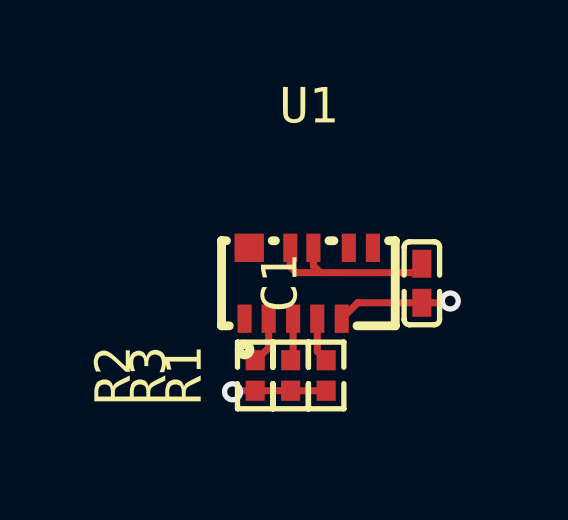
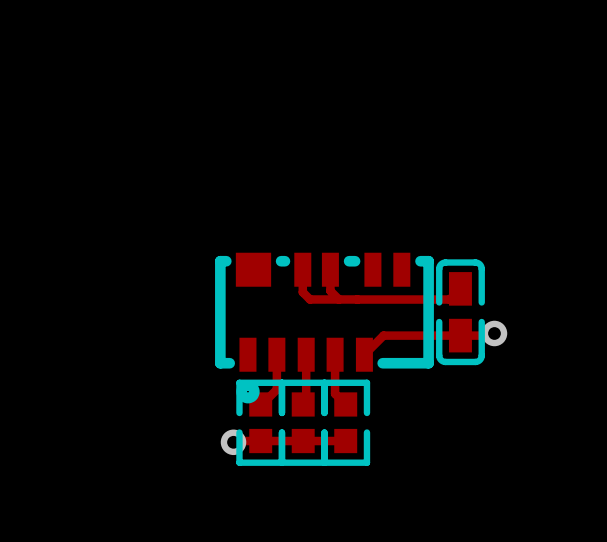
U1 name: U1 (308, 105) -> none
C1 name: C1 (278, 283) -> none
R2 name: R2 (111, 375) -> none
R3 name: R3 (147, 375) -> none
R1 name: R1 (182, 375) -> none

